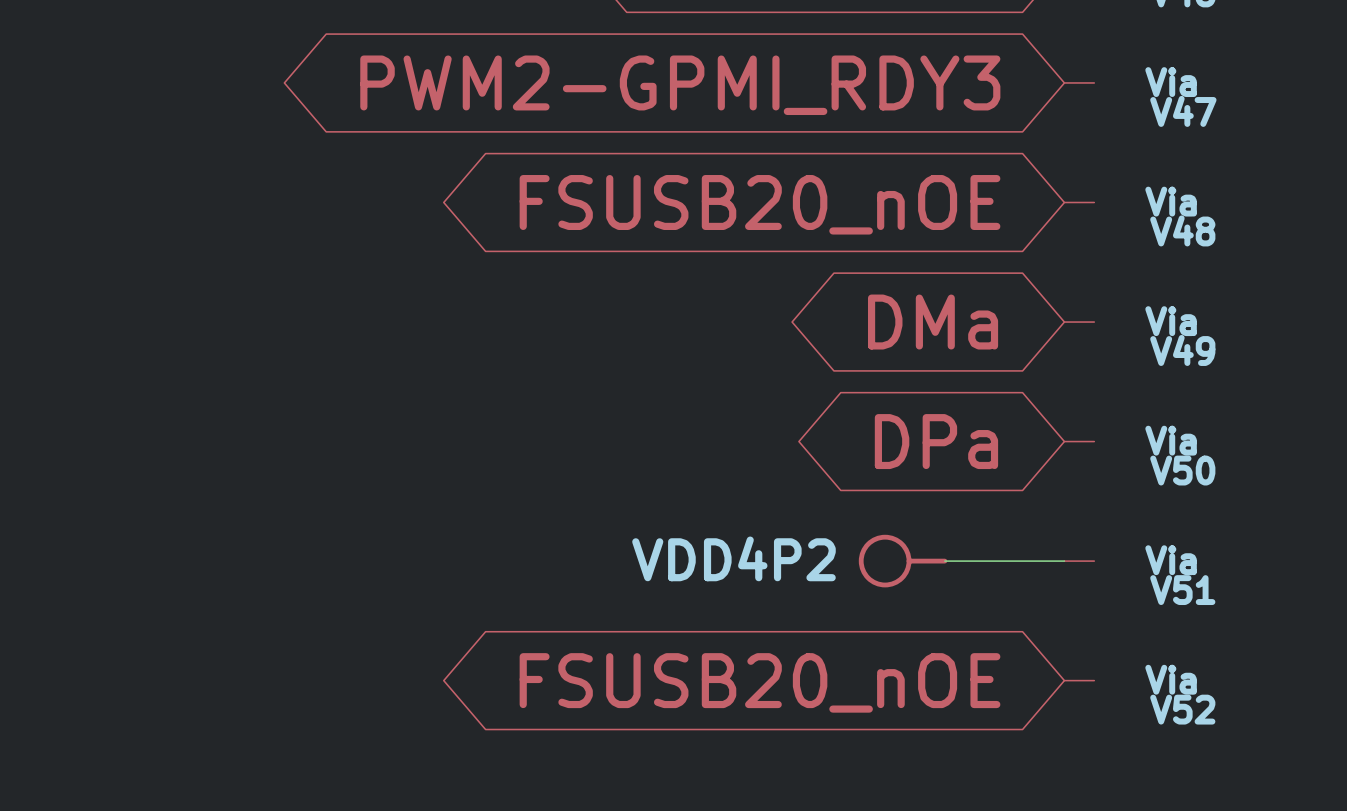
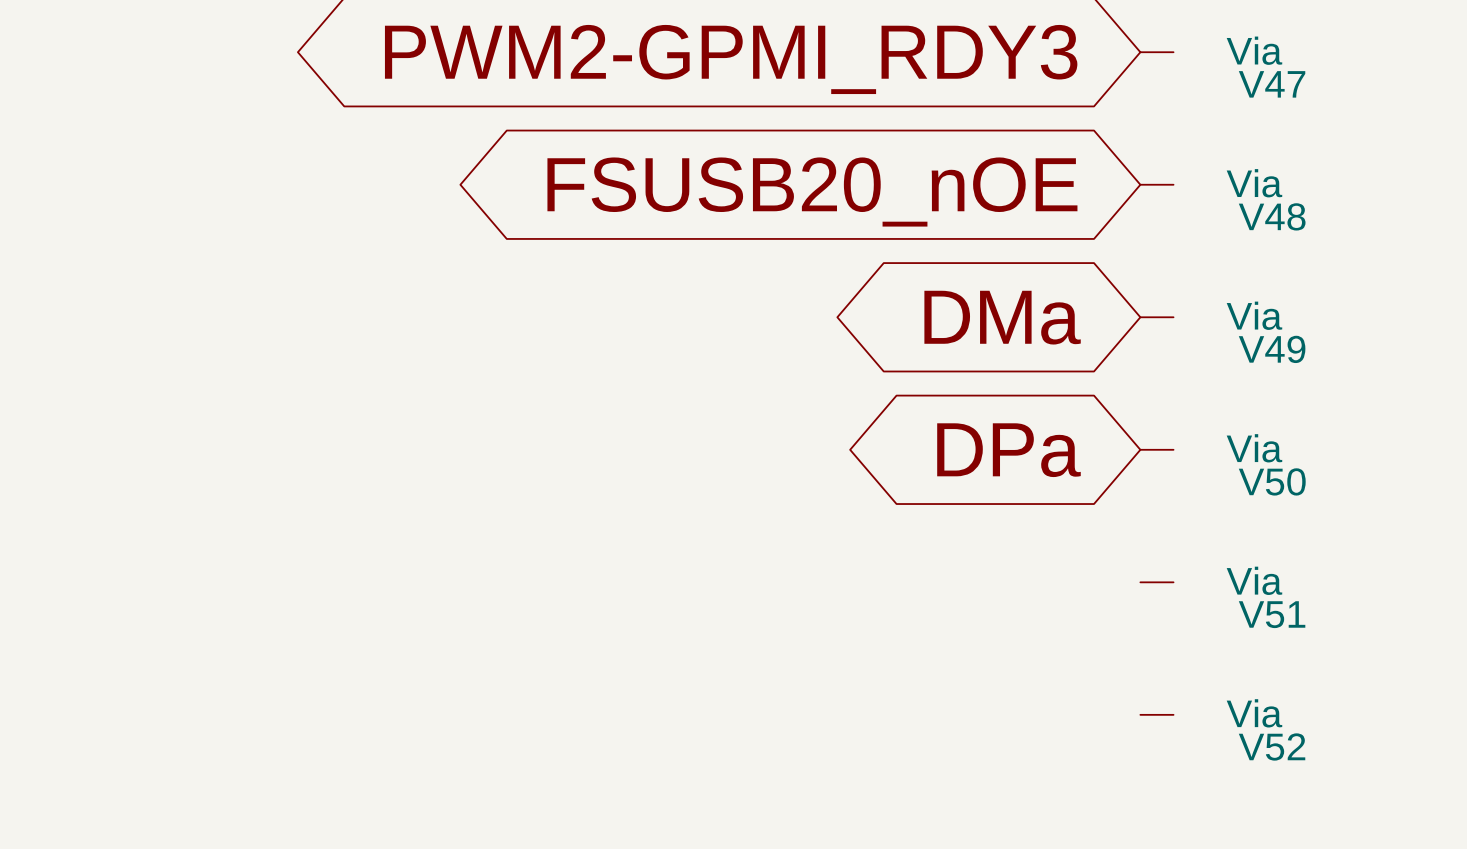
power symbol: VDD4P2 (903, 561) -> none
wire: (944, 561) (1064, 561) -> none
global label: FSUSB20_nOE (760, 682) -> none

